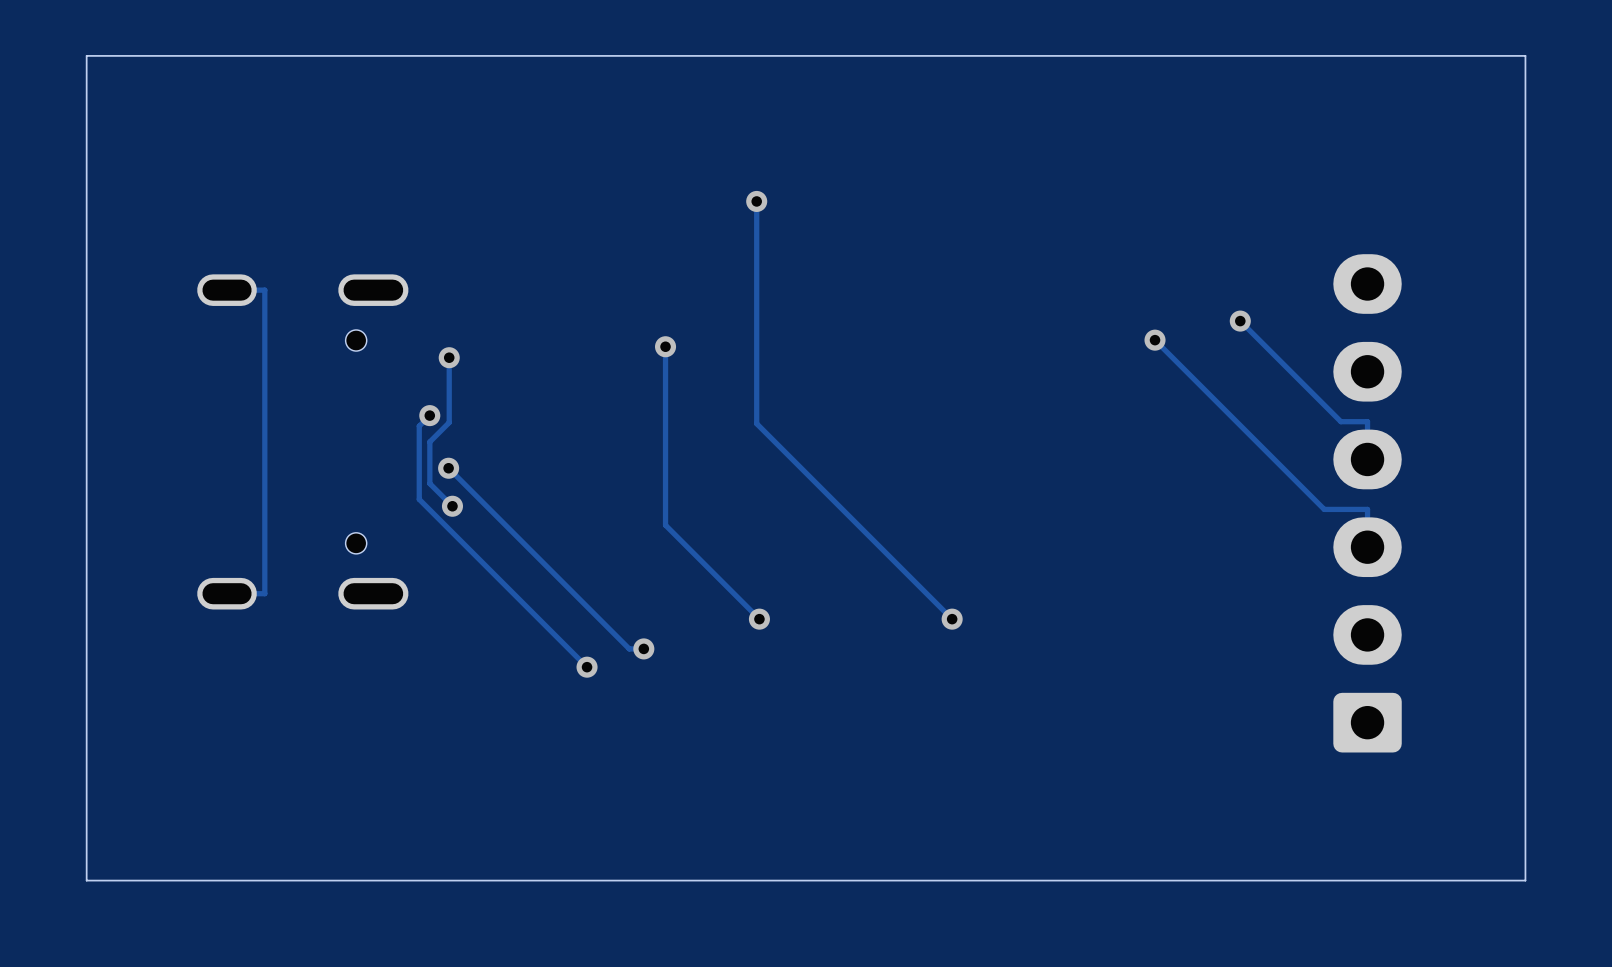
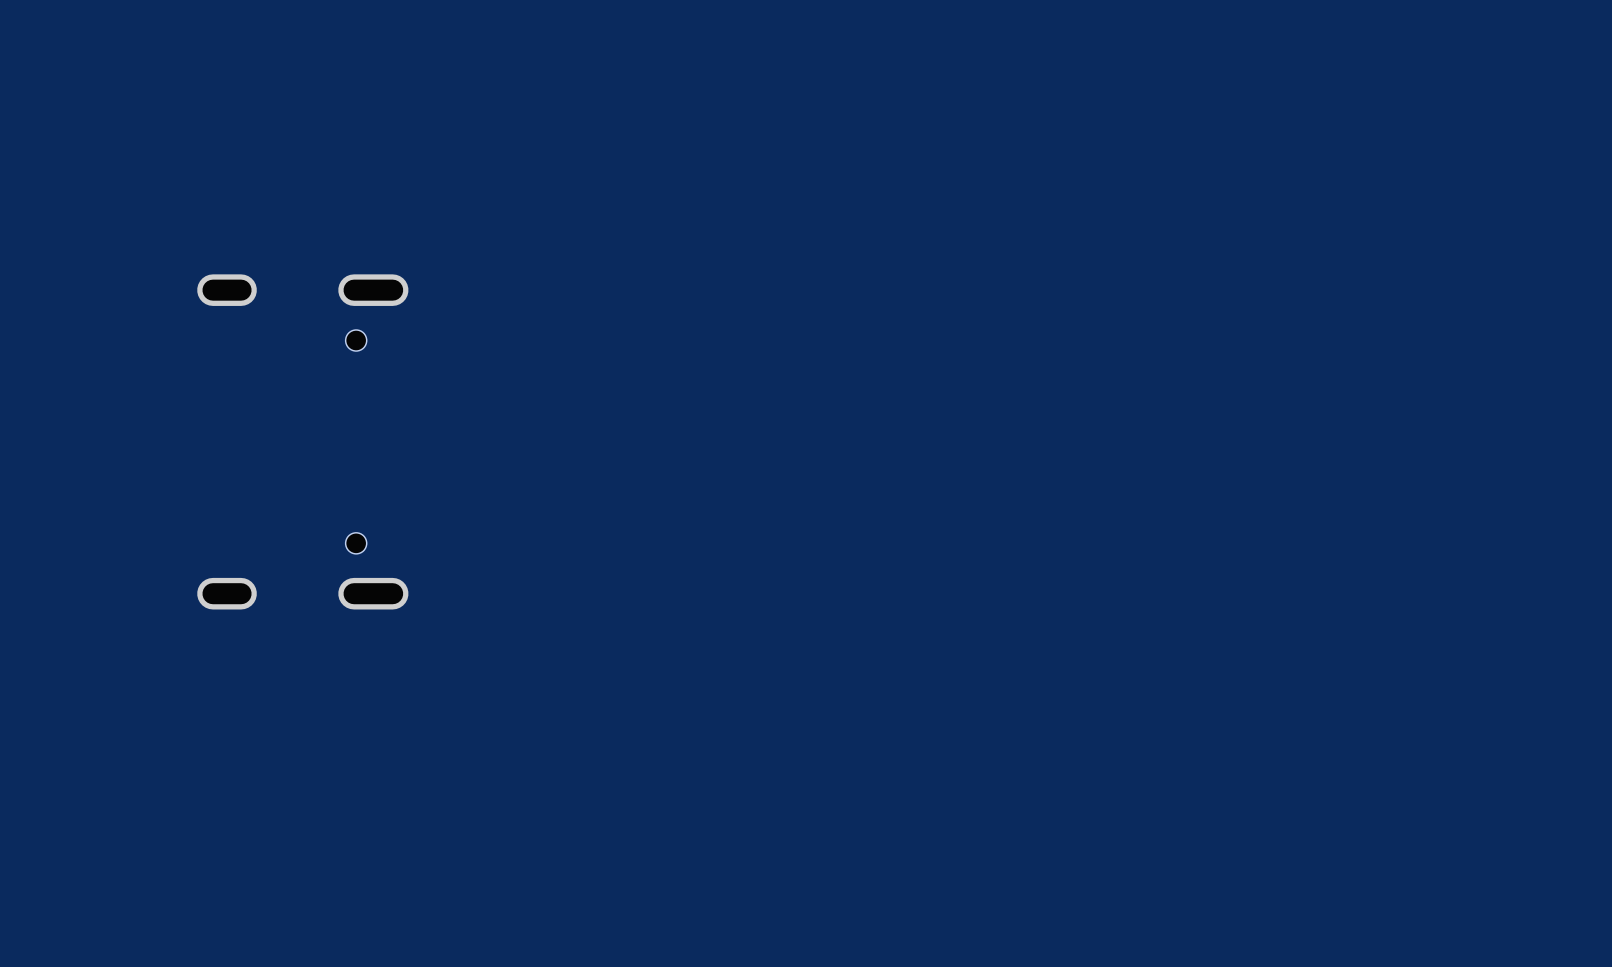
board edge: (1525, 55) (86, 55) (86, 880) (1525, 880) (1525, 55) -> none
track: (756, 201) (756, 423) (952, 619) -> none
via: (756, 201) -> none
track: (227, 290) (264, 290) (264, 593) (227, 593) -> none
track: (1240, 321) (1340, 421) (1367, 421) (1367, 459) -> none
via: (1240, 321) -> none
track: (1155, 340) (1324, 509) (1367, 509) (1367, 547) -> none
via: (1155, 340) -> none
track: (665, 346) (665, 525) (759, 619) -> none
via: (665, 346) -> none
track: (449, 357) (449, 422) (429, 441) (429, 483) (452, 506) -> none
via: (449, 357) -> none
track: (429, 415) (419, 426) (419, 499) (587, 667) -> none
via: (429, 415) -> none
track: (448, 468) (629, 648) (643, 648) -> none
via: (448, 468) -> none
part: (1367, 503) -> none
via: (452, 506) -> none
via: (759, 619) -> none
via: (952, 619) -> none
via: (643, 648) -> none
via: (587, 667) -> none

